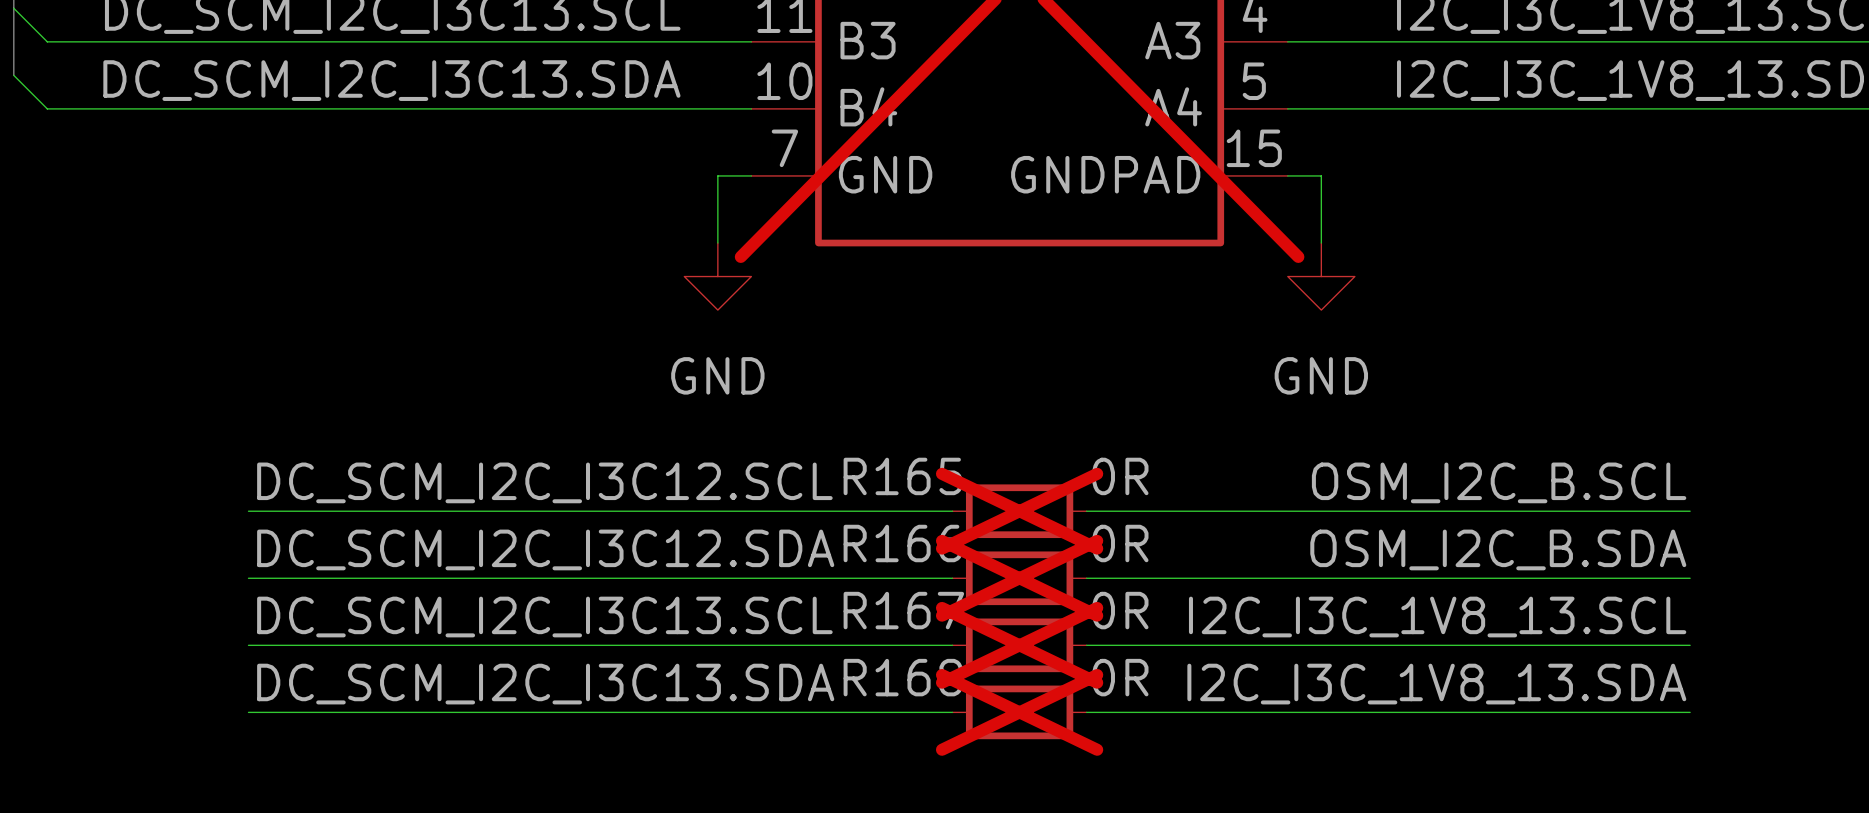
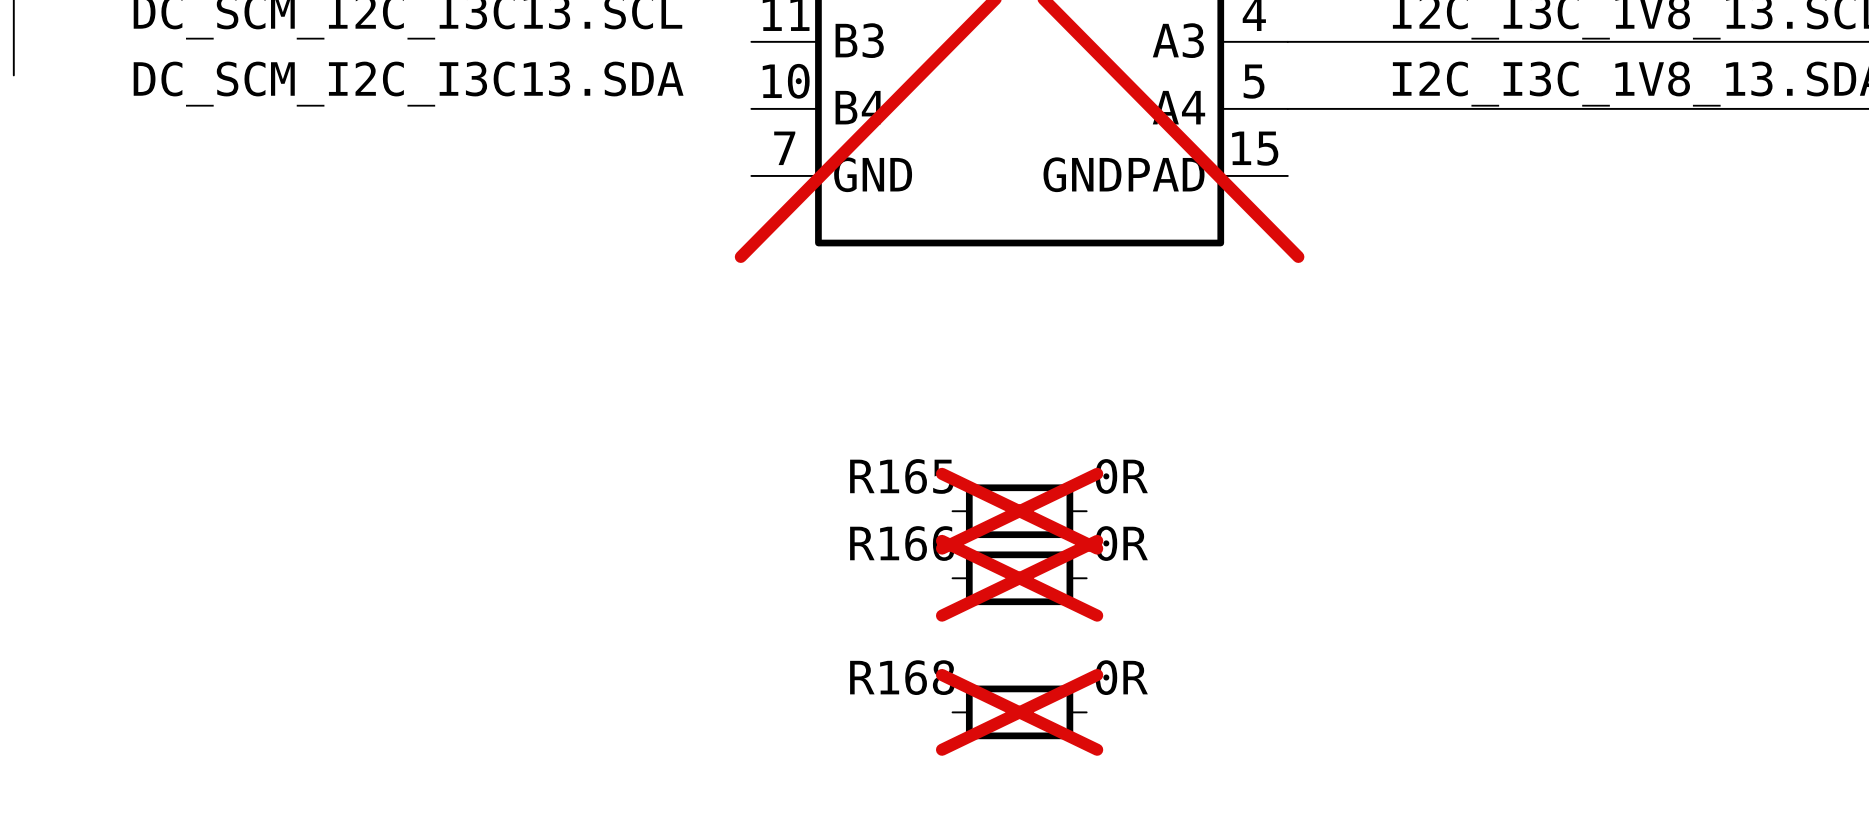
wire: (13, 8) (47, 41) (751, 41) -> none
wire: (13, 75) (47, 108) (751, 108) -> none
wire: (751, 175) (717, 175) (717, 243) -> none
wire: (1287, 175) (1321, 175) (1321, 243) -> none
power symbol: GND (717, 276) -> none
power symbol: GND (1321, 276) -> none
label: DC_SCM_I2C_I3C12.SCL (544, 482) -> none
label: OSM_I2C_B.SCL (1499, 482) -> none
wire: (248, 511) (952, 511) -> none
wire: (1086, 511) (1690, 511) -> none
label: DC_SCM_I2C_I3C12.SDA (545, 549) -> none
label: OSM_I2C_B.SDA (1498, 549) -> none
wire: (248, 578) (952, 578) -> none
wire: (1086, 578) (1690, 578) -> none
label: DC_SCM_I2C_I3C13.SCL (544, 617) -> none
label: I2C_I3C_1V8_13.SCL (1437, 617) -> none
wire: (248, 645) (952, 645) -> none
R167: (1019, 645) -> none
wire: (1086, 645) (1690, 645) -> none
label: DC_SCM_I2C_I3C13.SDA (545, 684) -> none
label: I2C_I3C_1V8_13.SDA (1436, 684) -> none
wire: (248, 712) (952, 712) -> none
wire: (1086, 712) (1690, 712) -> none

